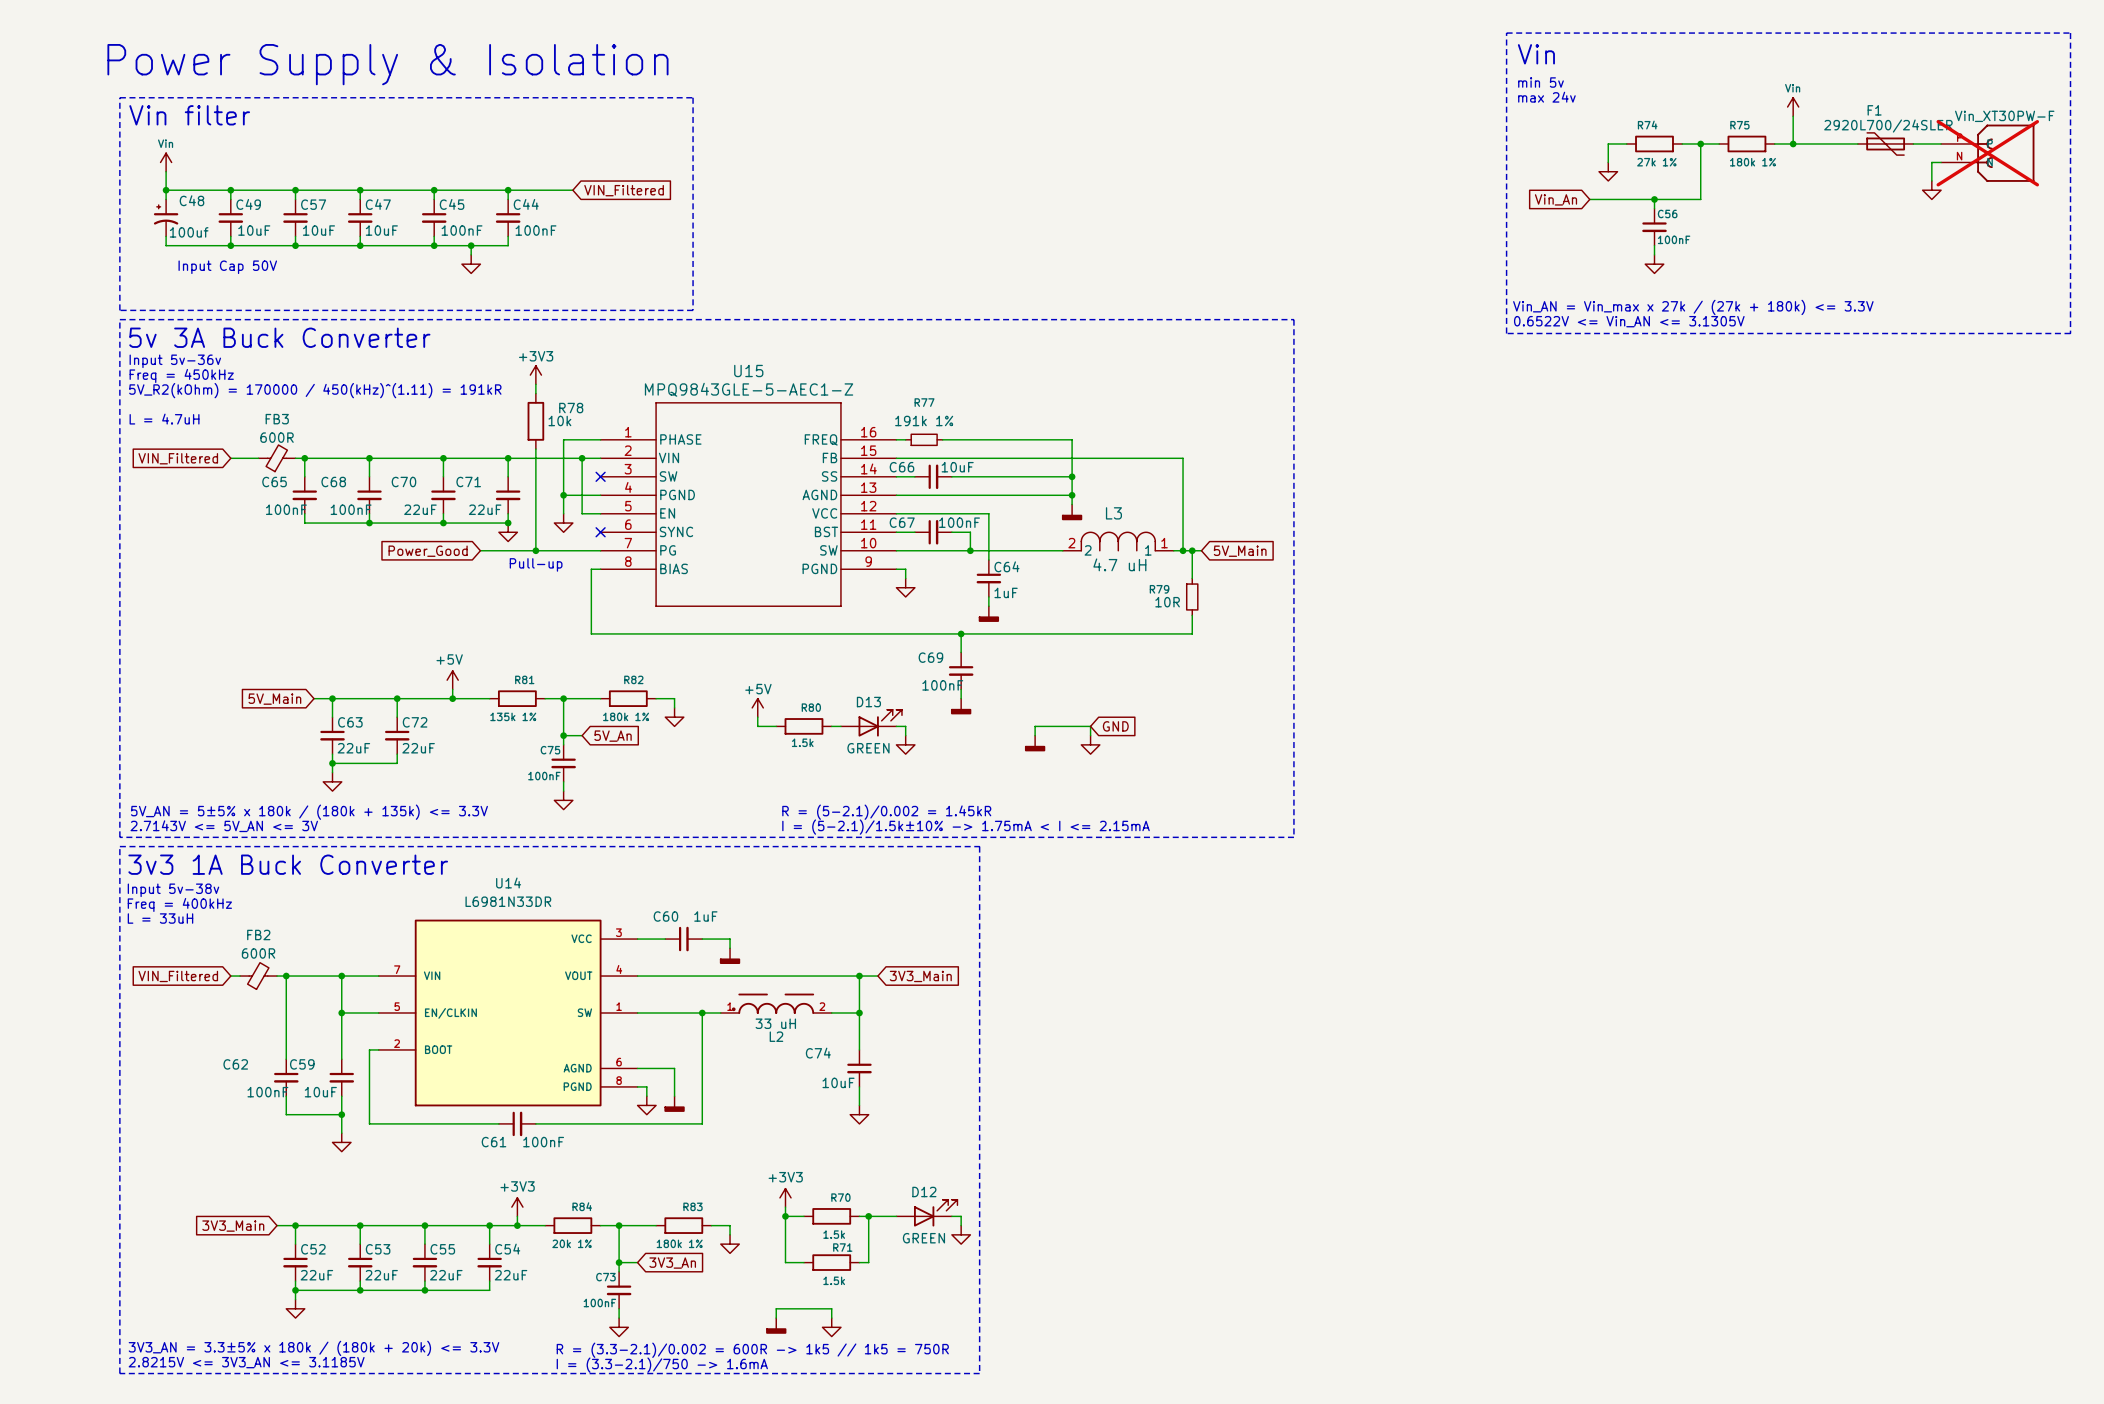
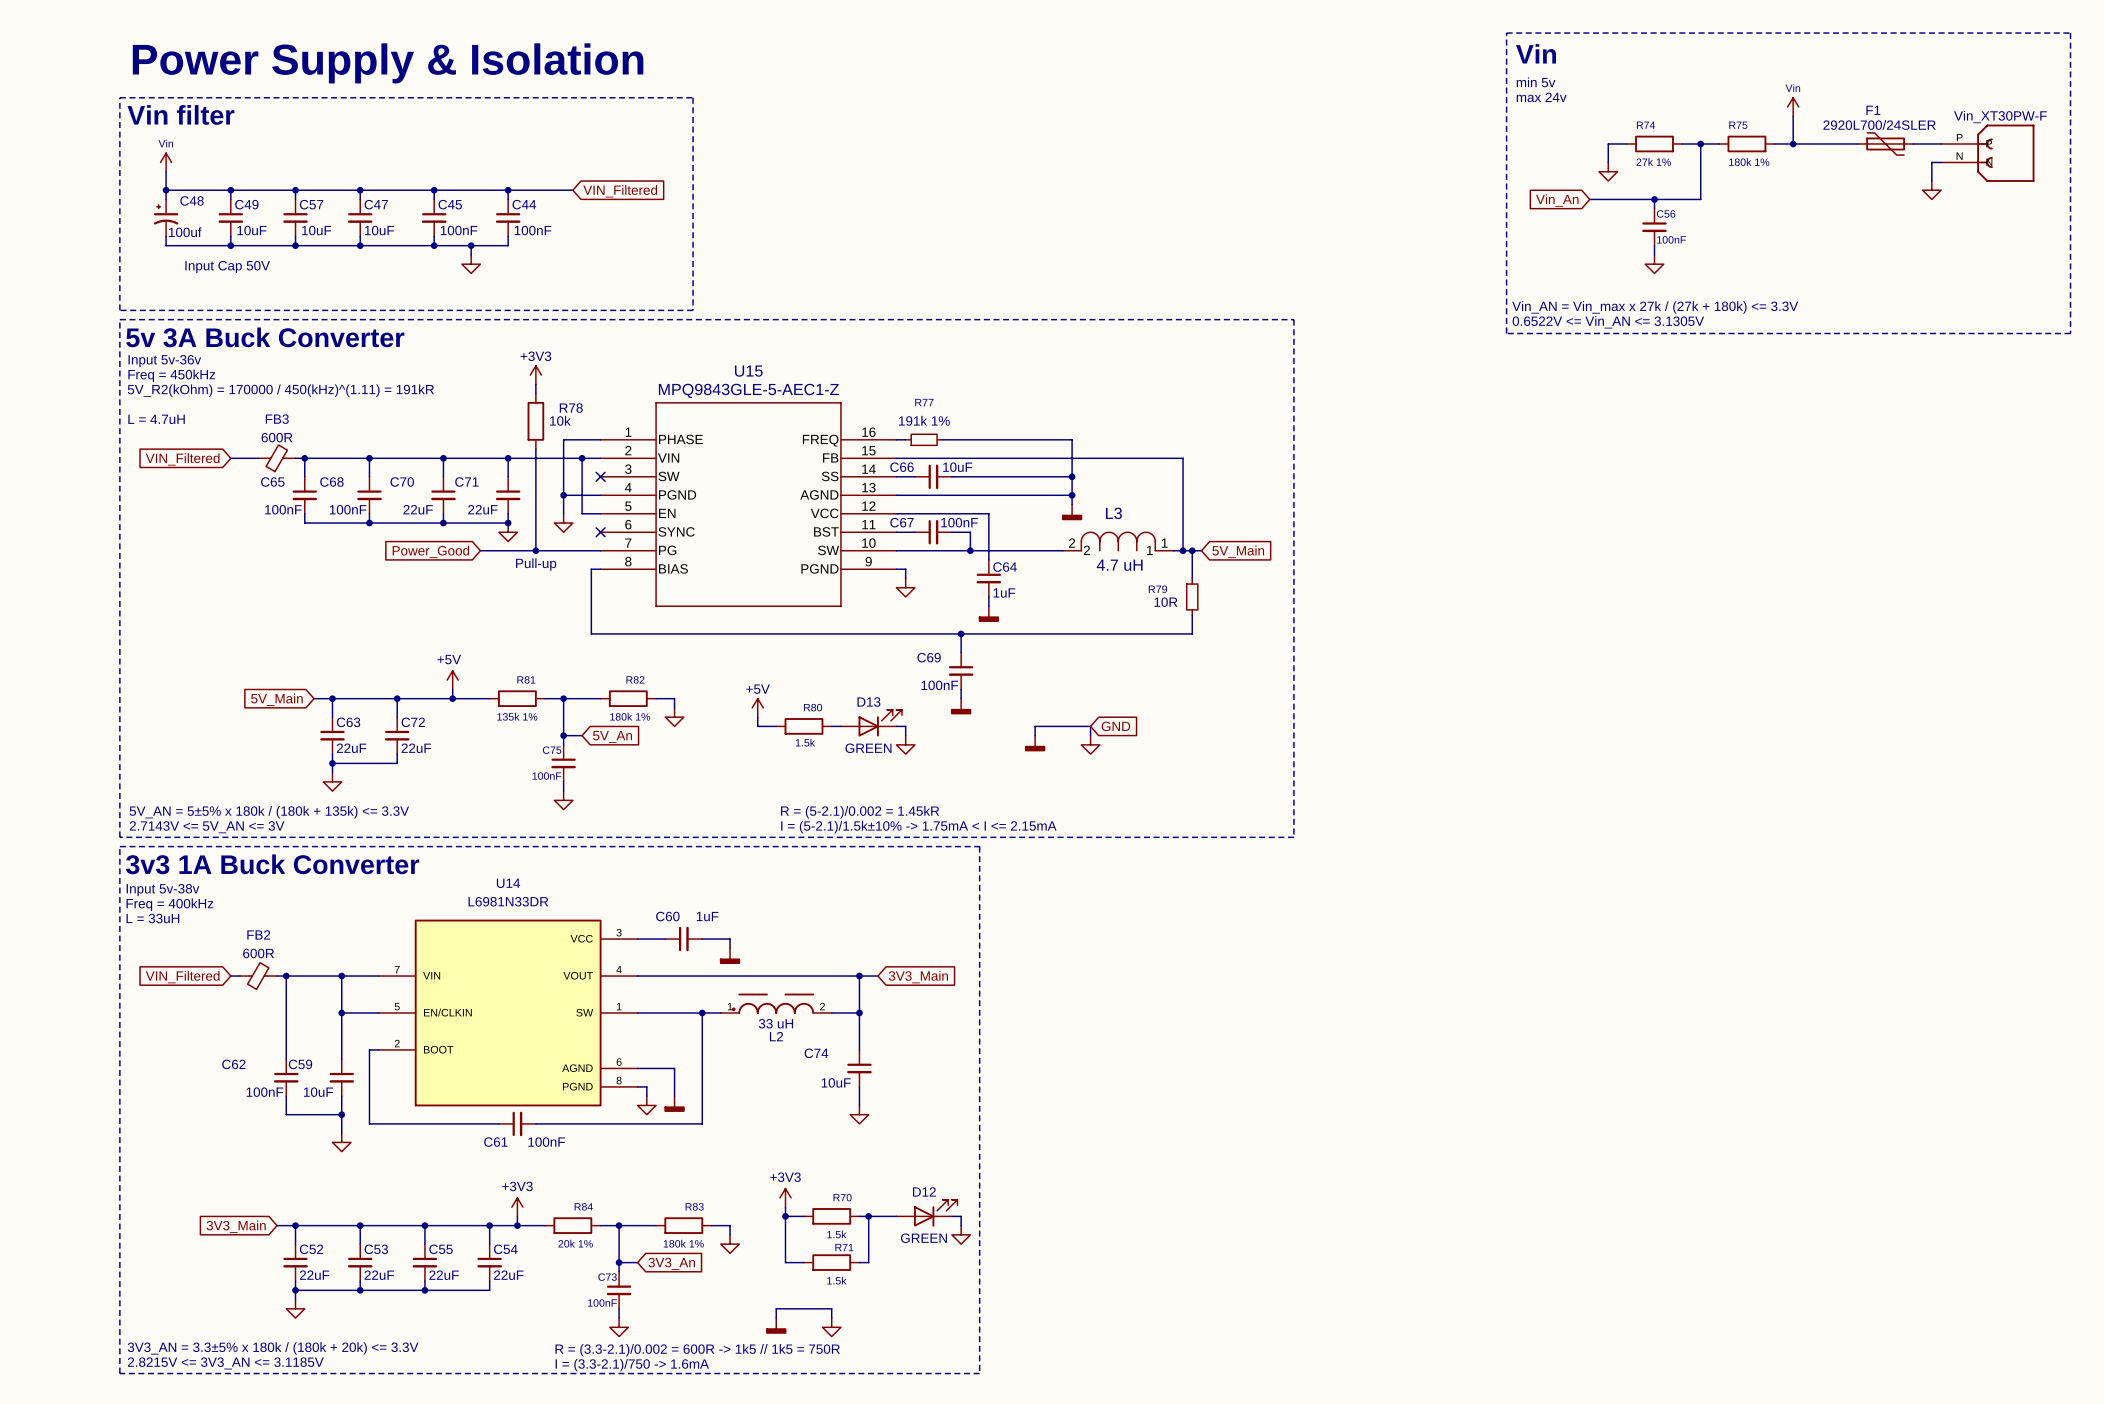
part do-not-place cross: (1987, 153) -> none

